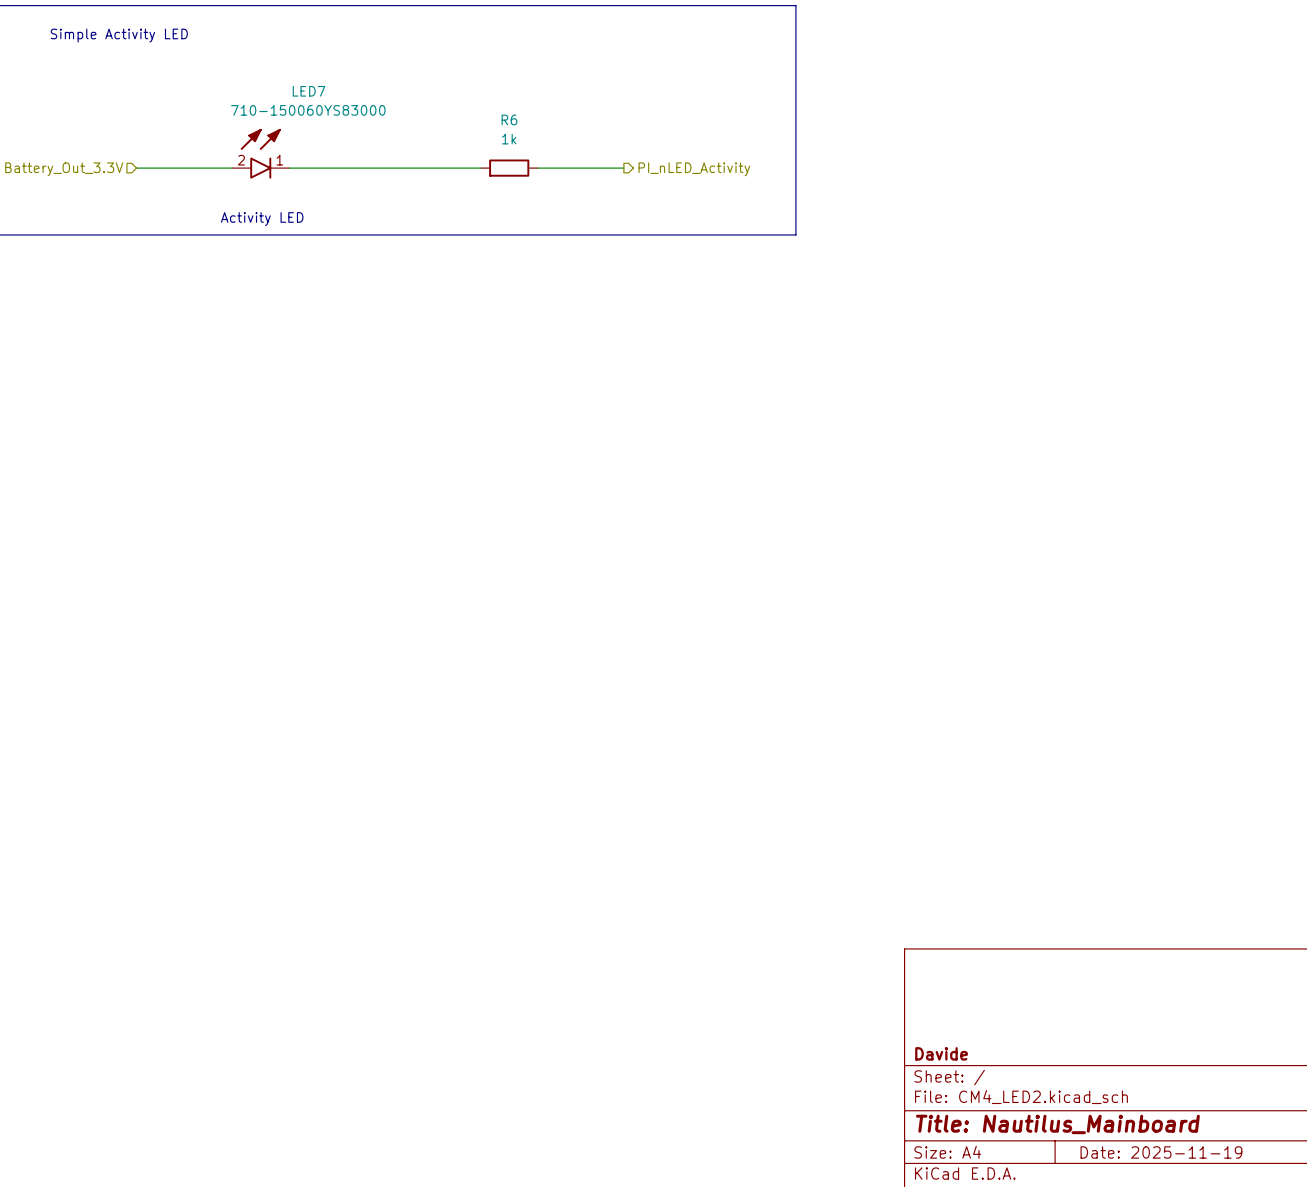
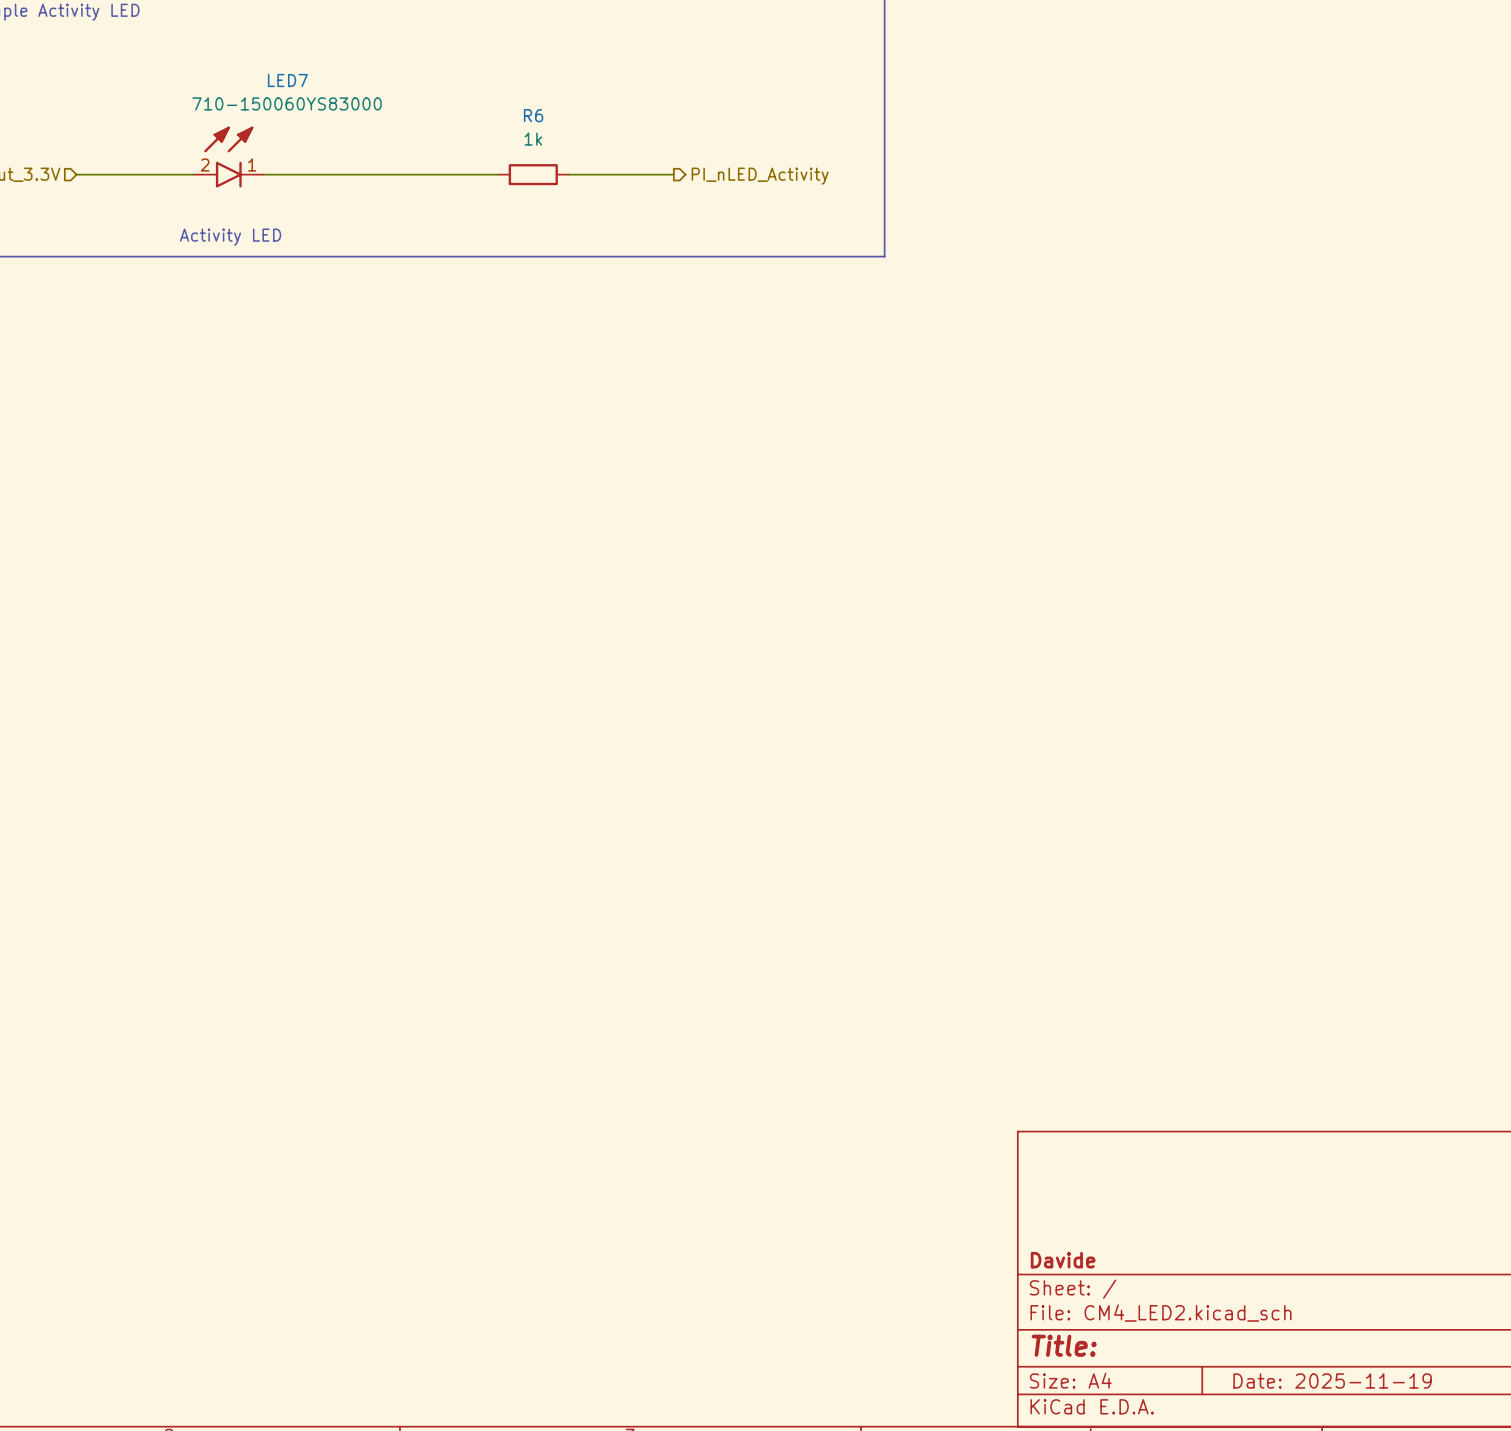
title block: Title: Nautilus_Mainboard (1057, 1124) -> Title: (1064, 1345)

